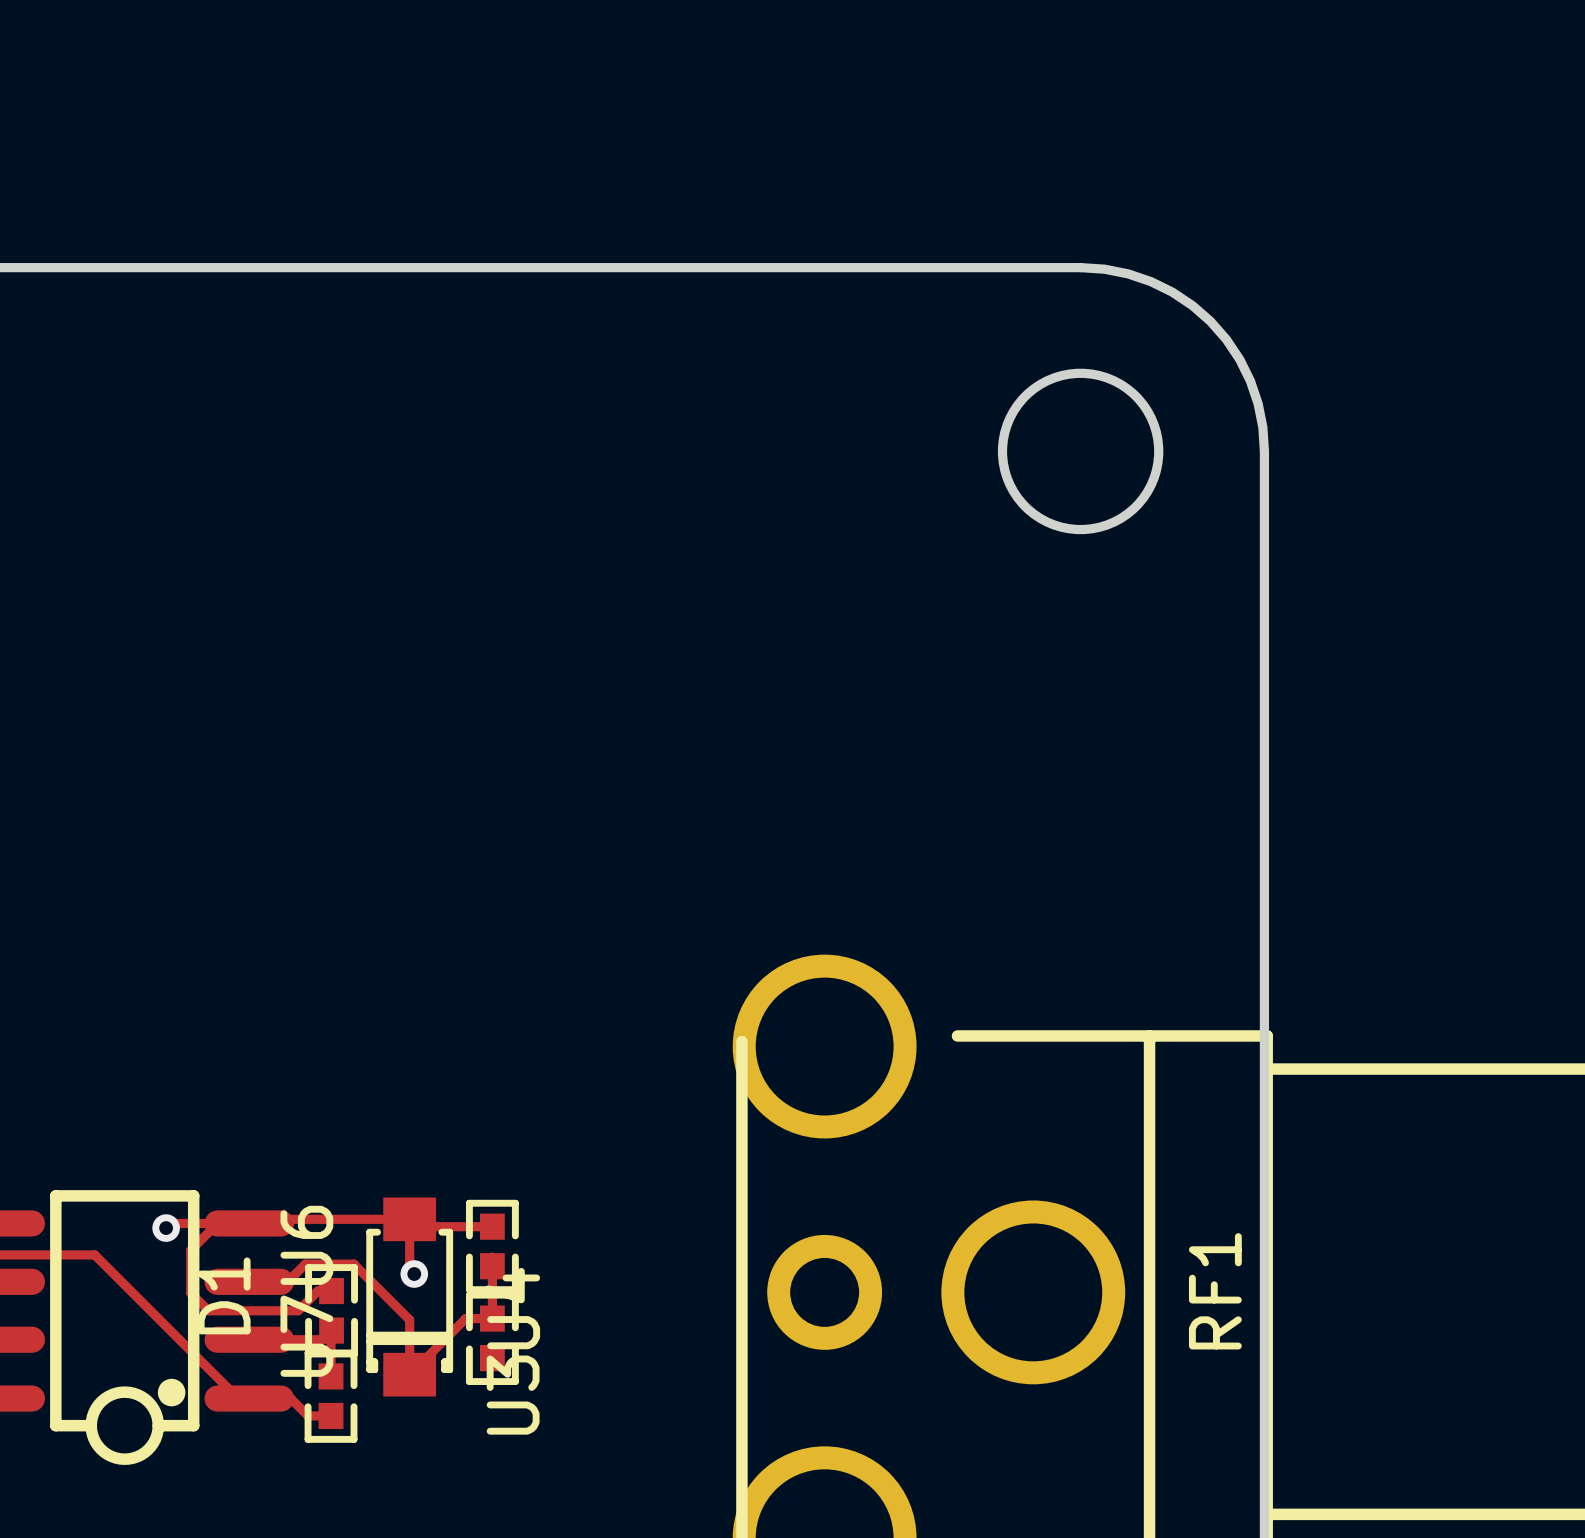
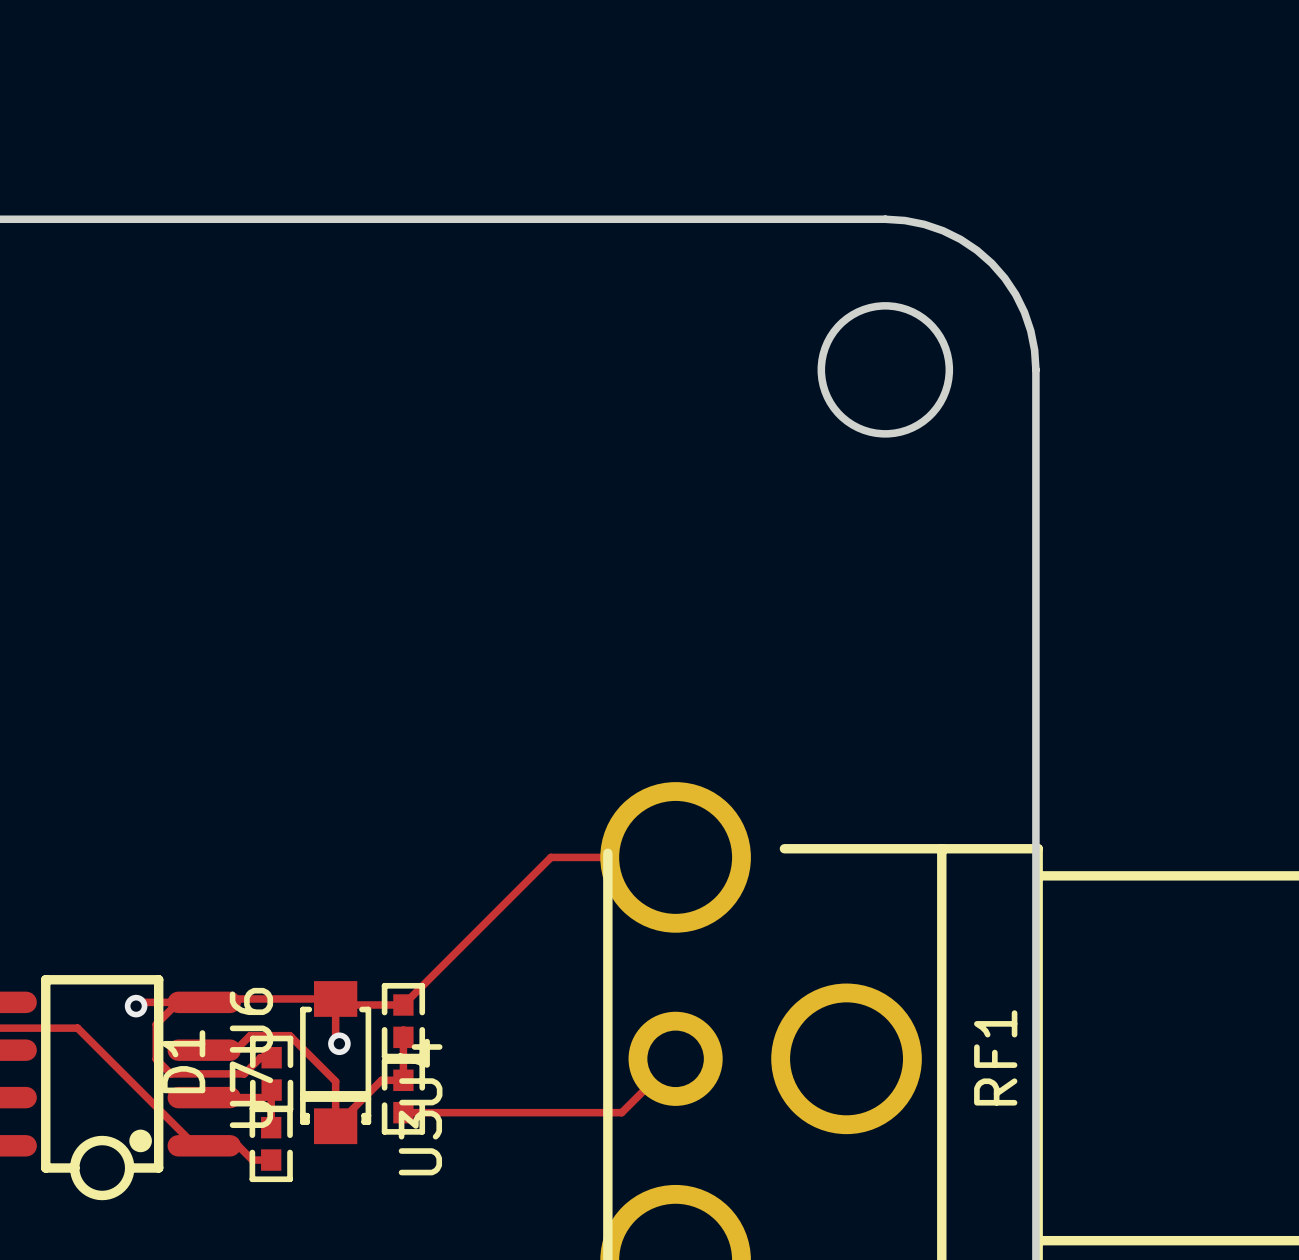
track: none -> (675, 857) (550, 857) (403, 1004)
track: none -> (675, 1058) (621, 1112) (403, 1112)

